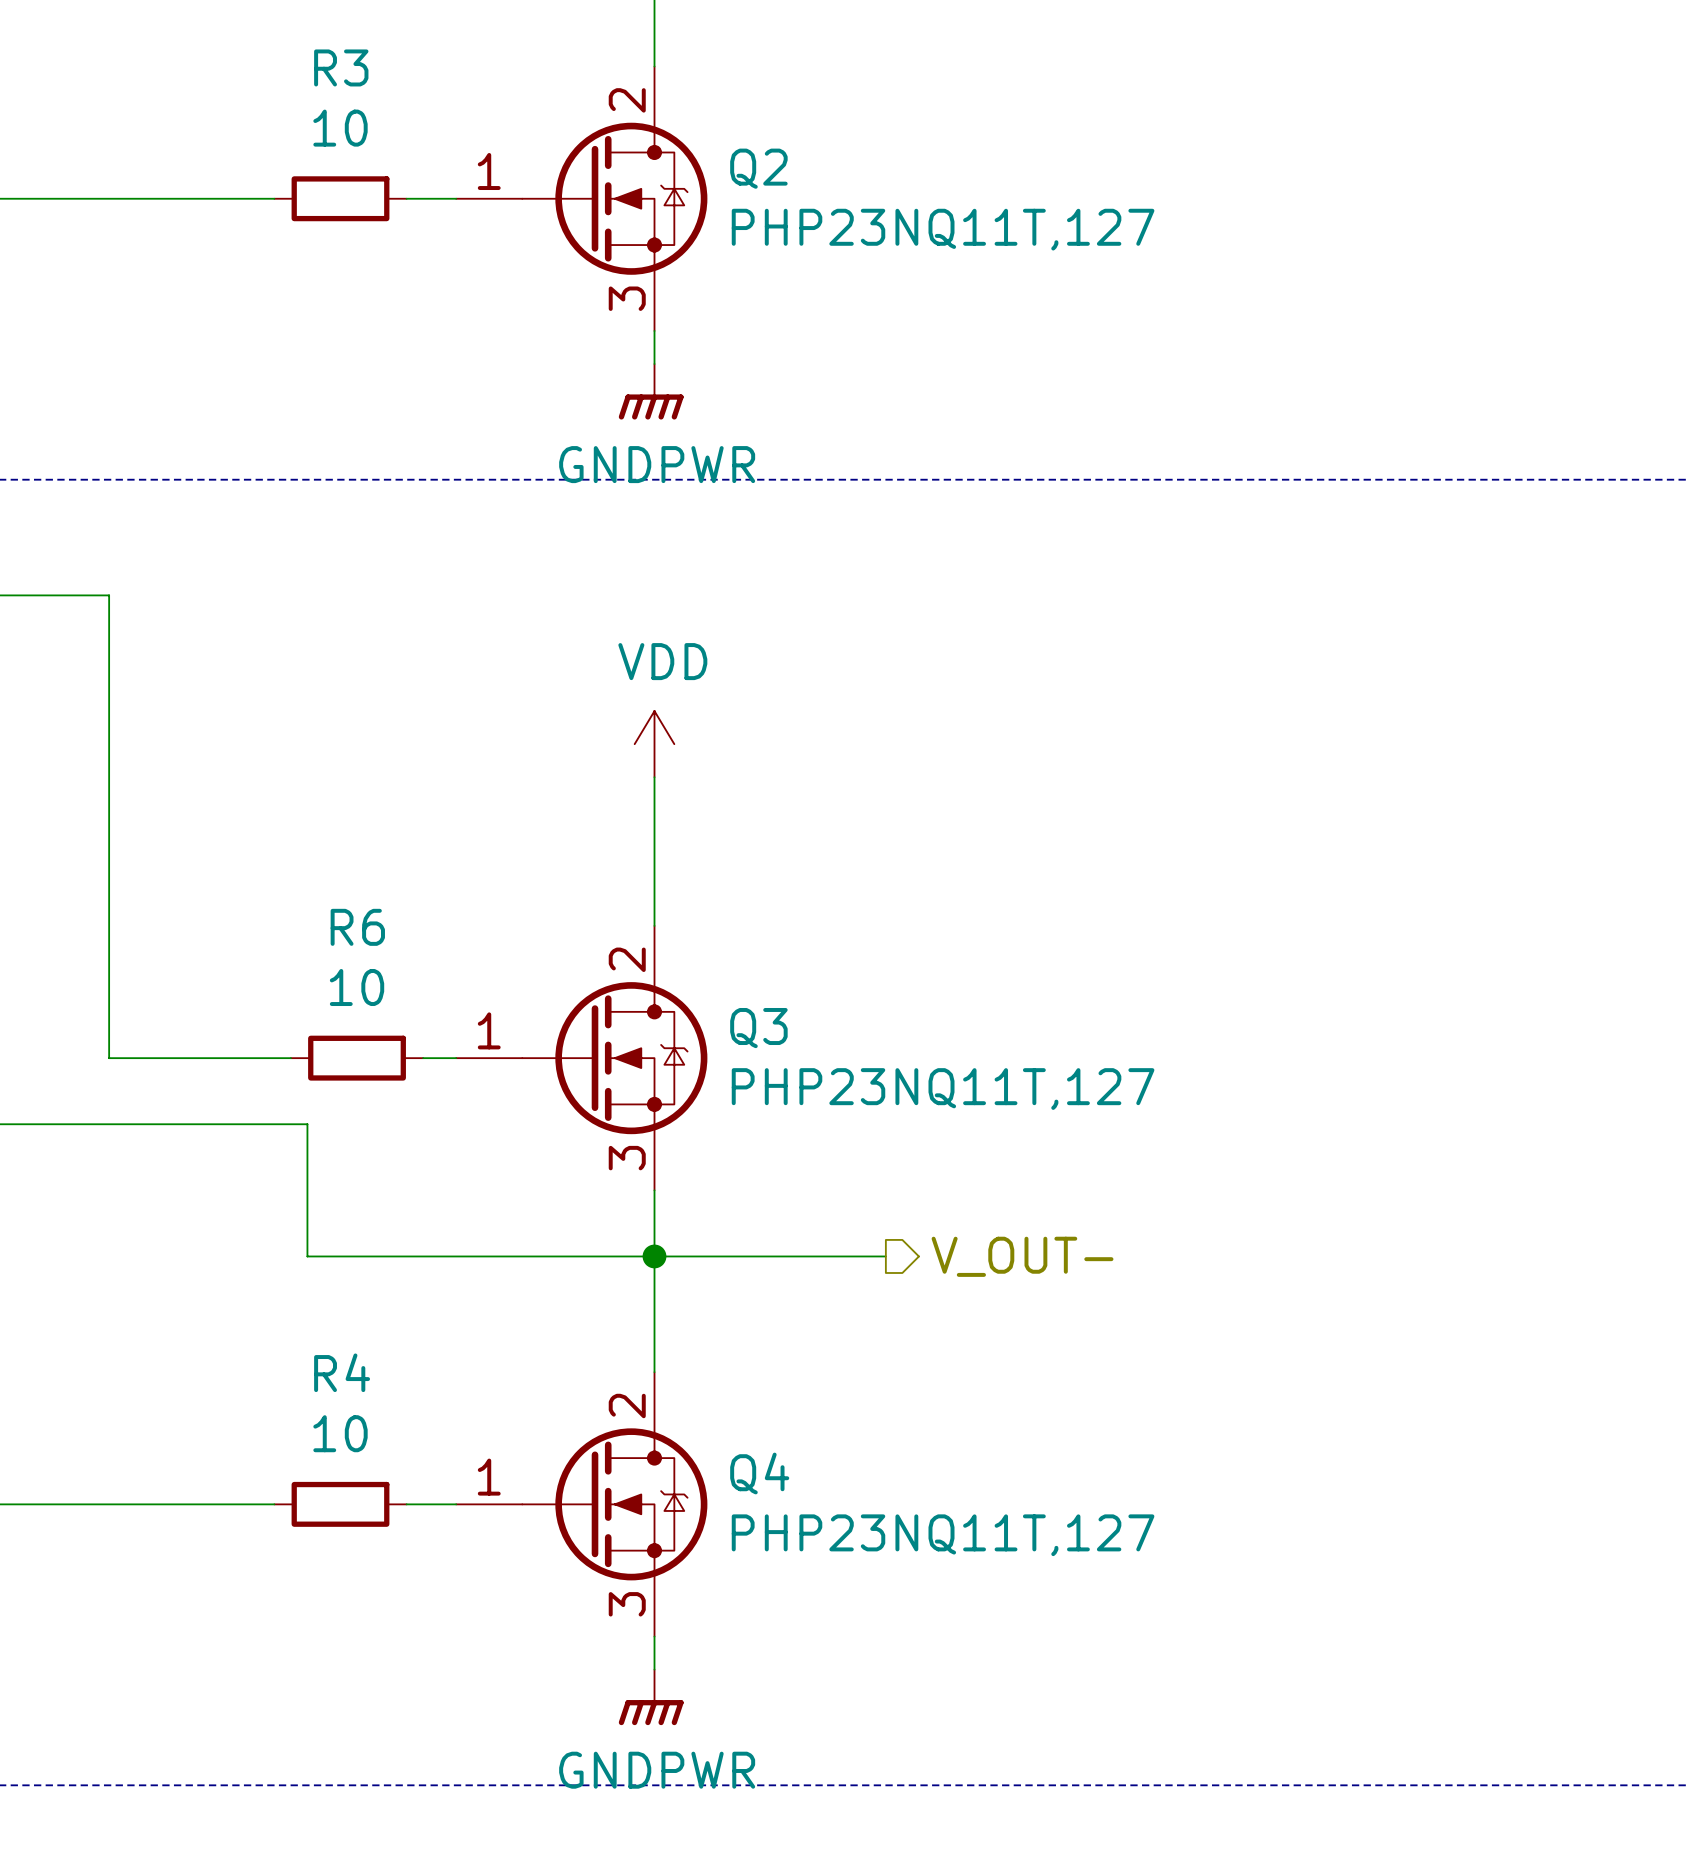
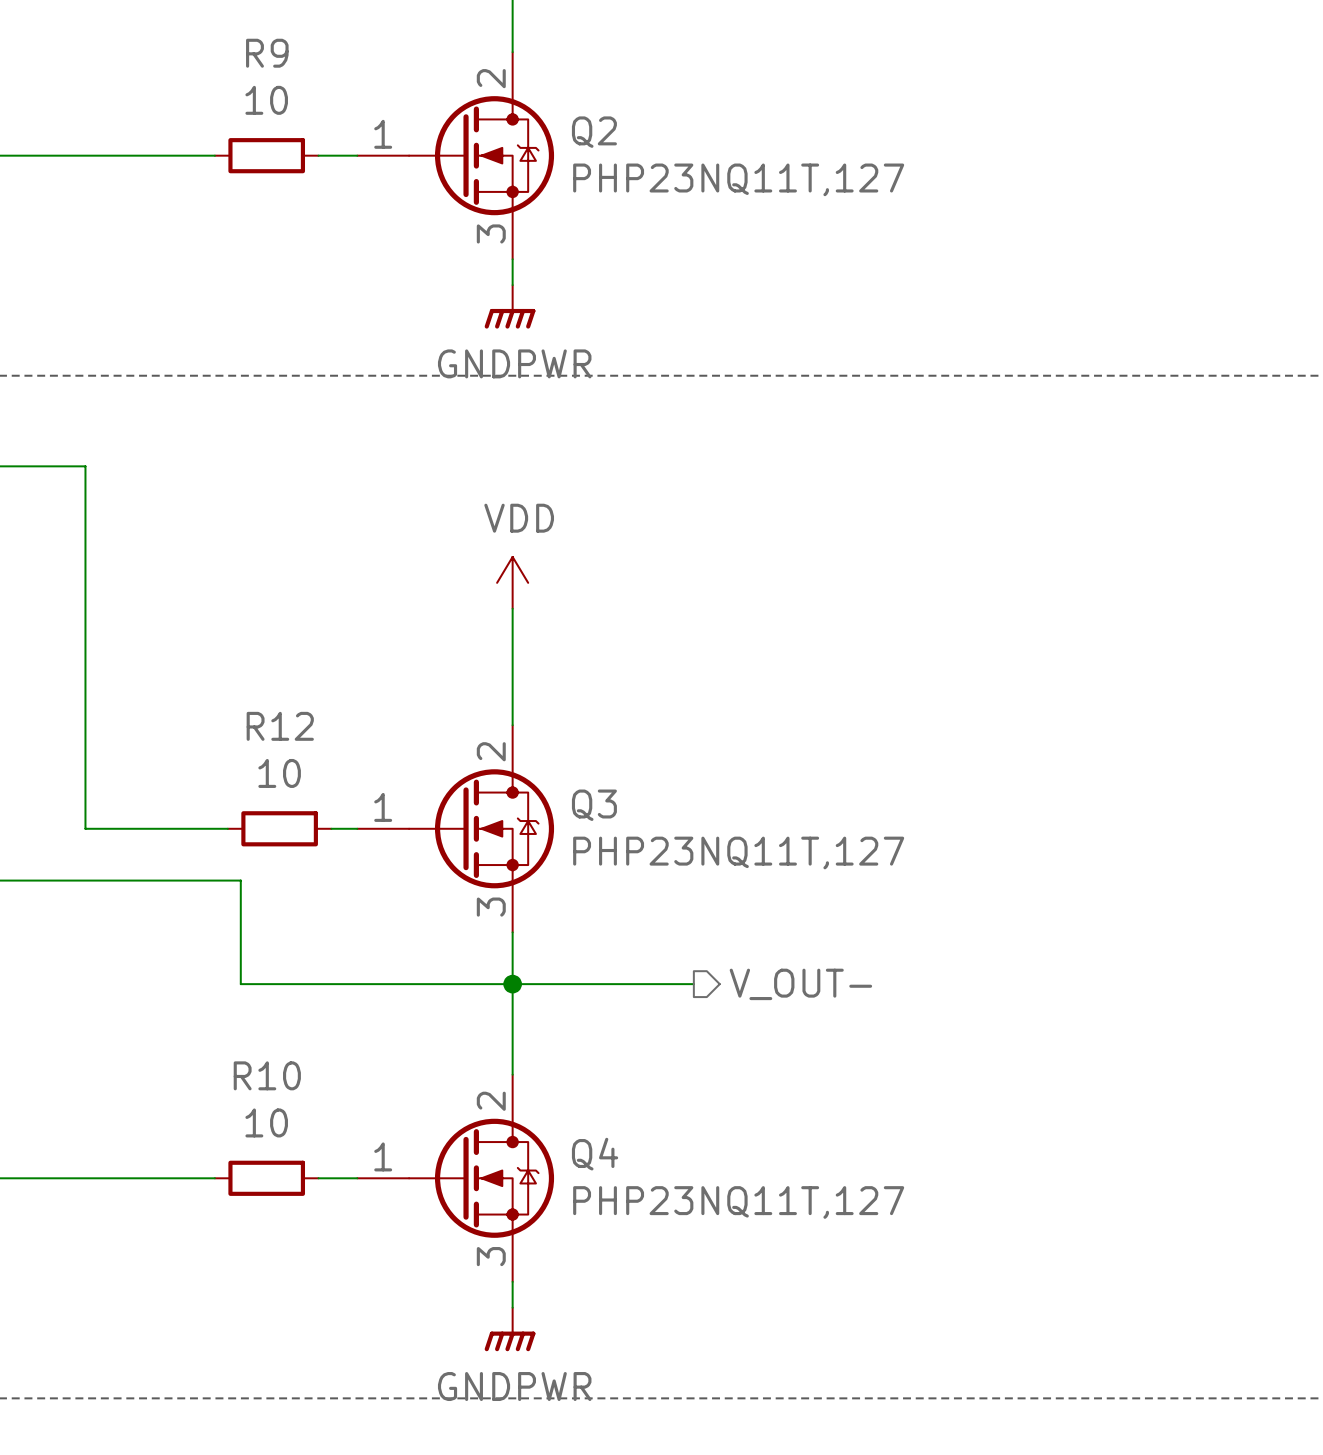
R3 name: R3 (341, 67) -> R9 (267, 53)
R6 name: R6 (357, 927) -> R12 (280, 726)
R4 name: R4 (342, 1372) -> R10 (267, 1075)

